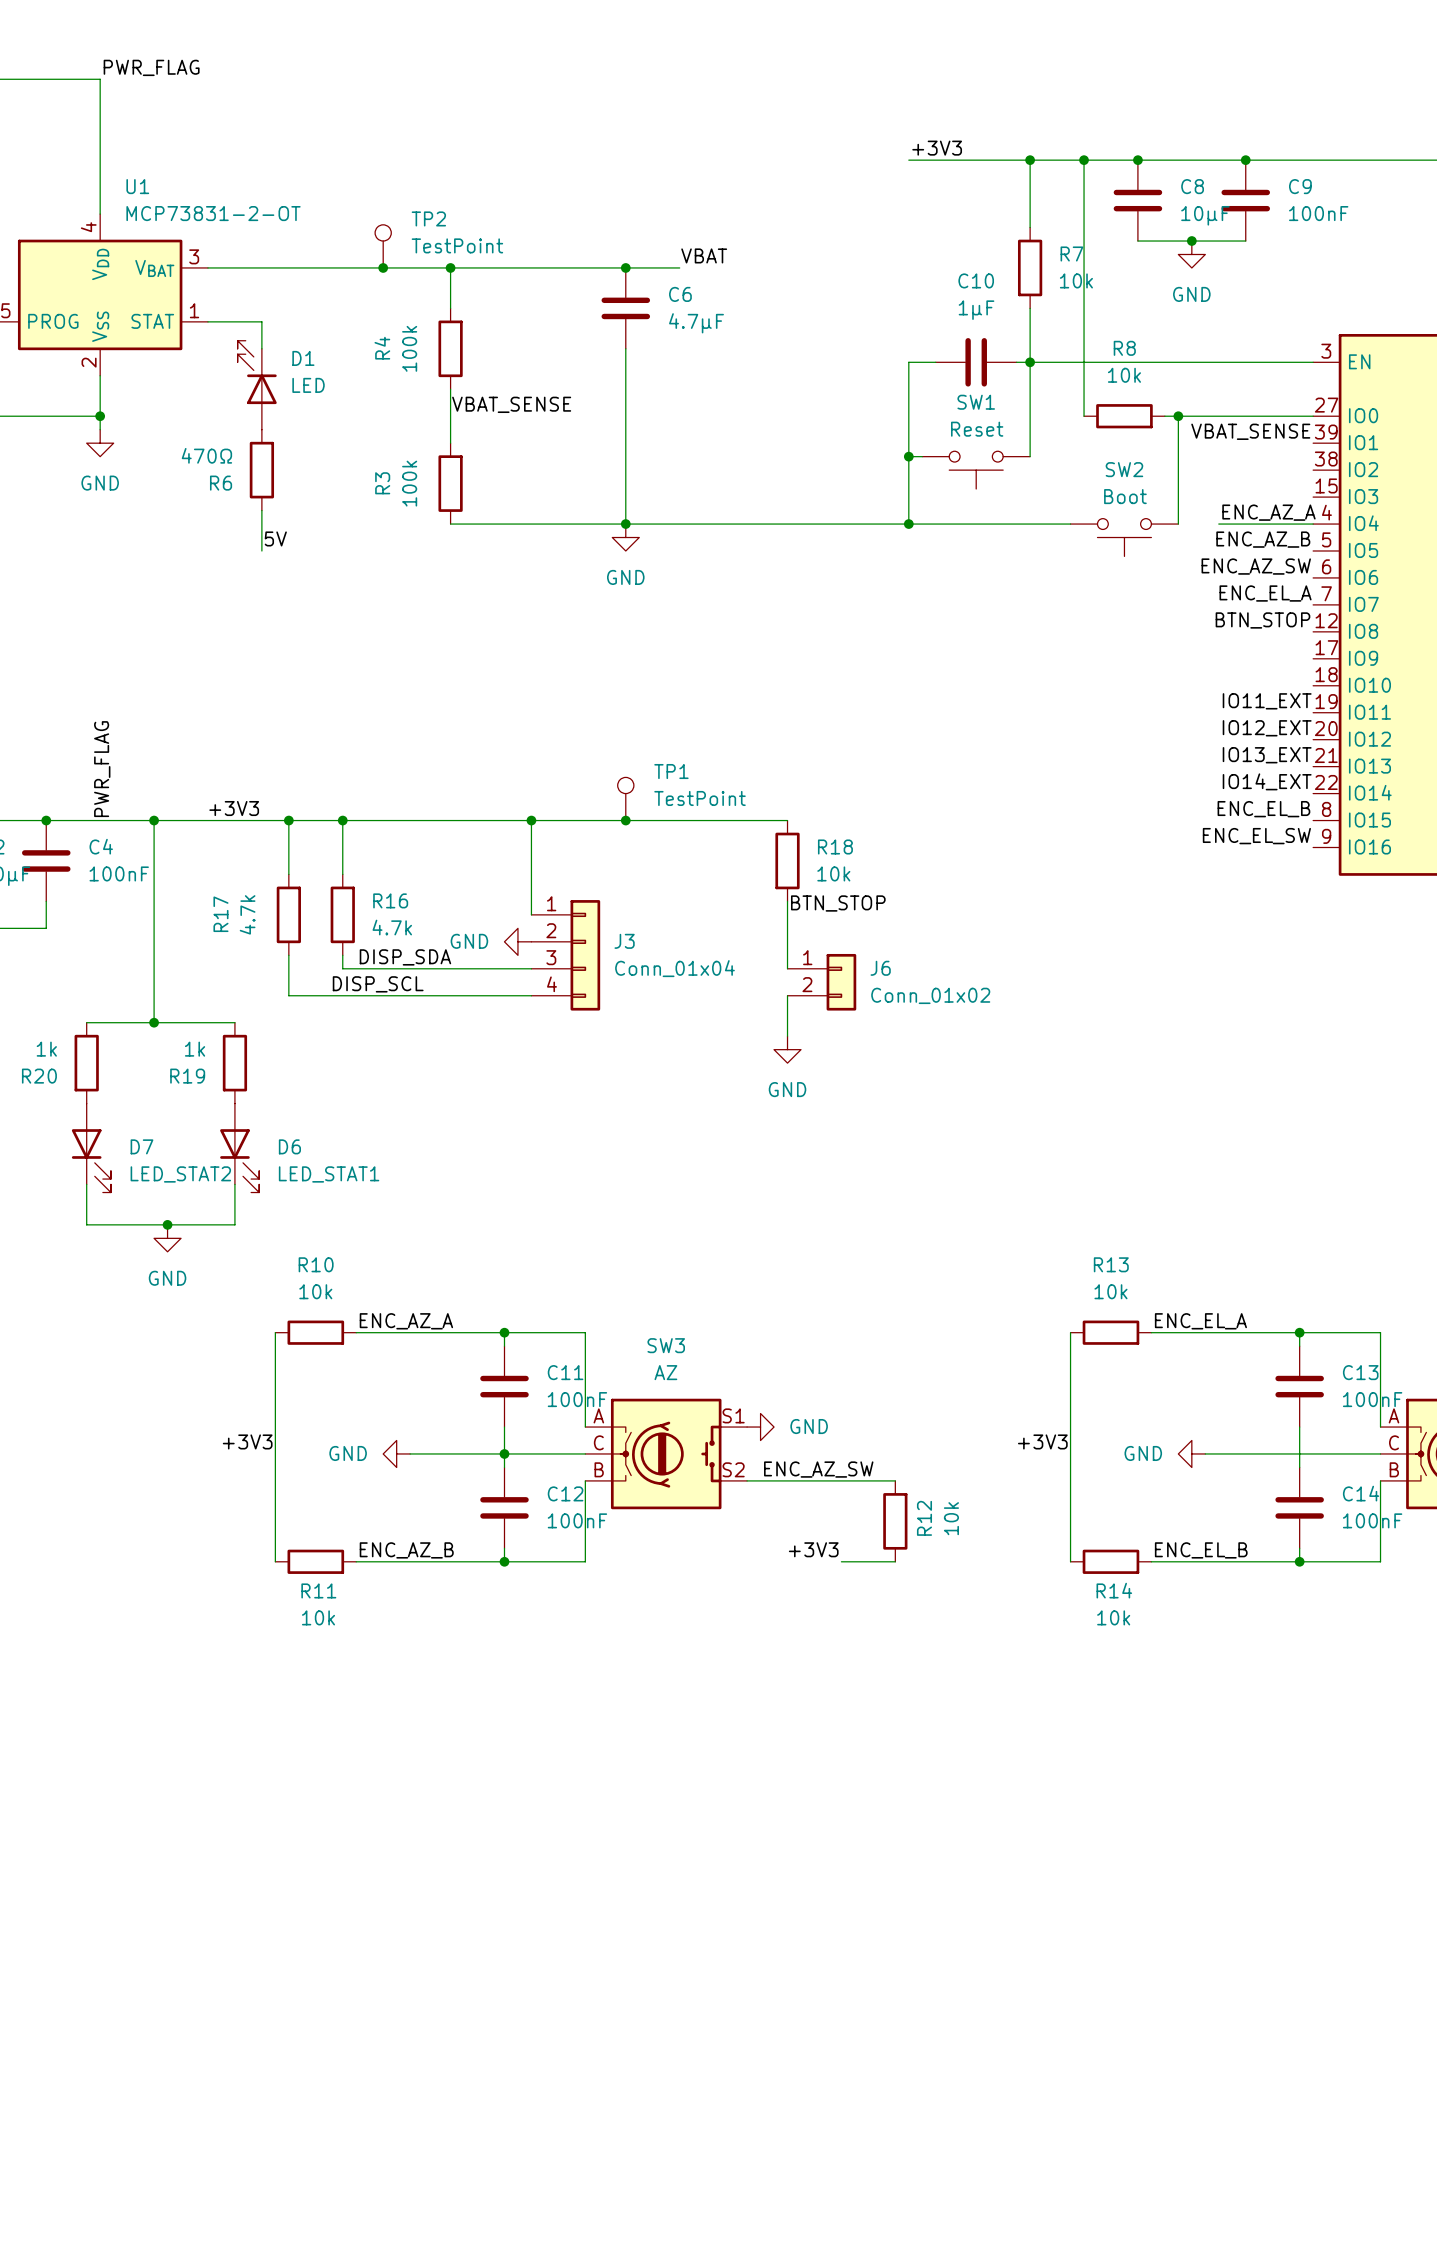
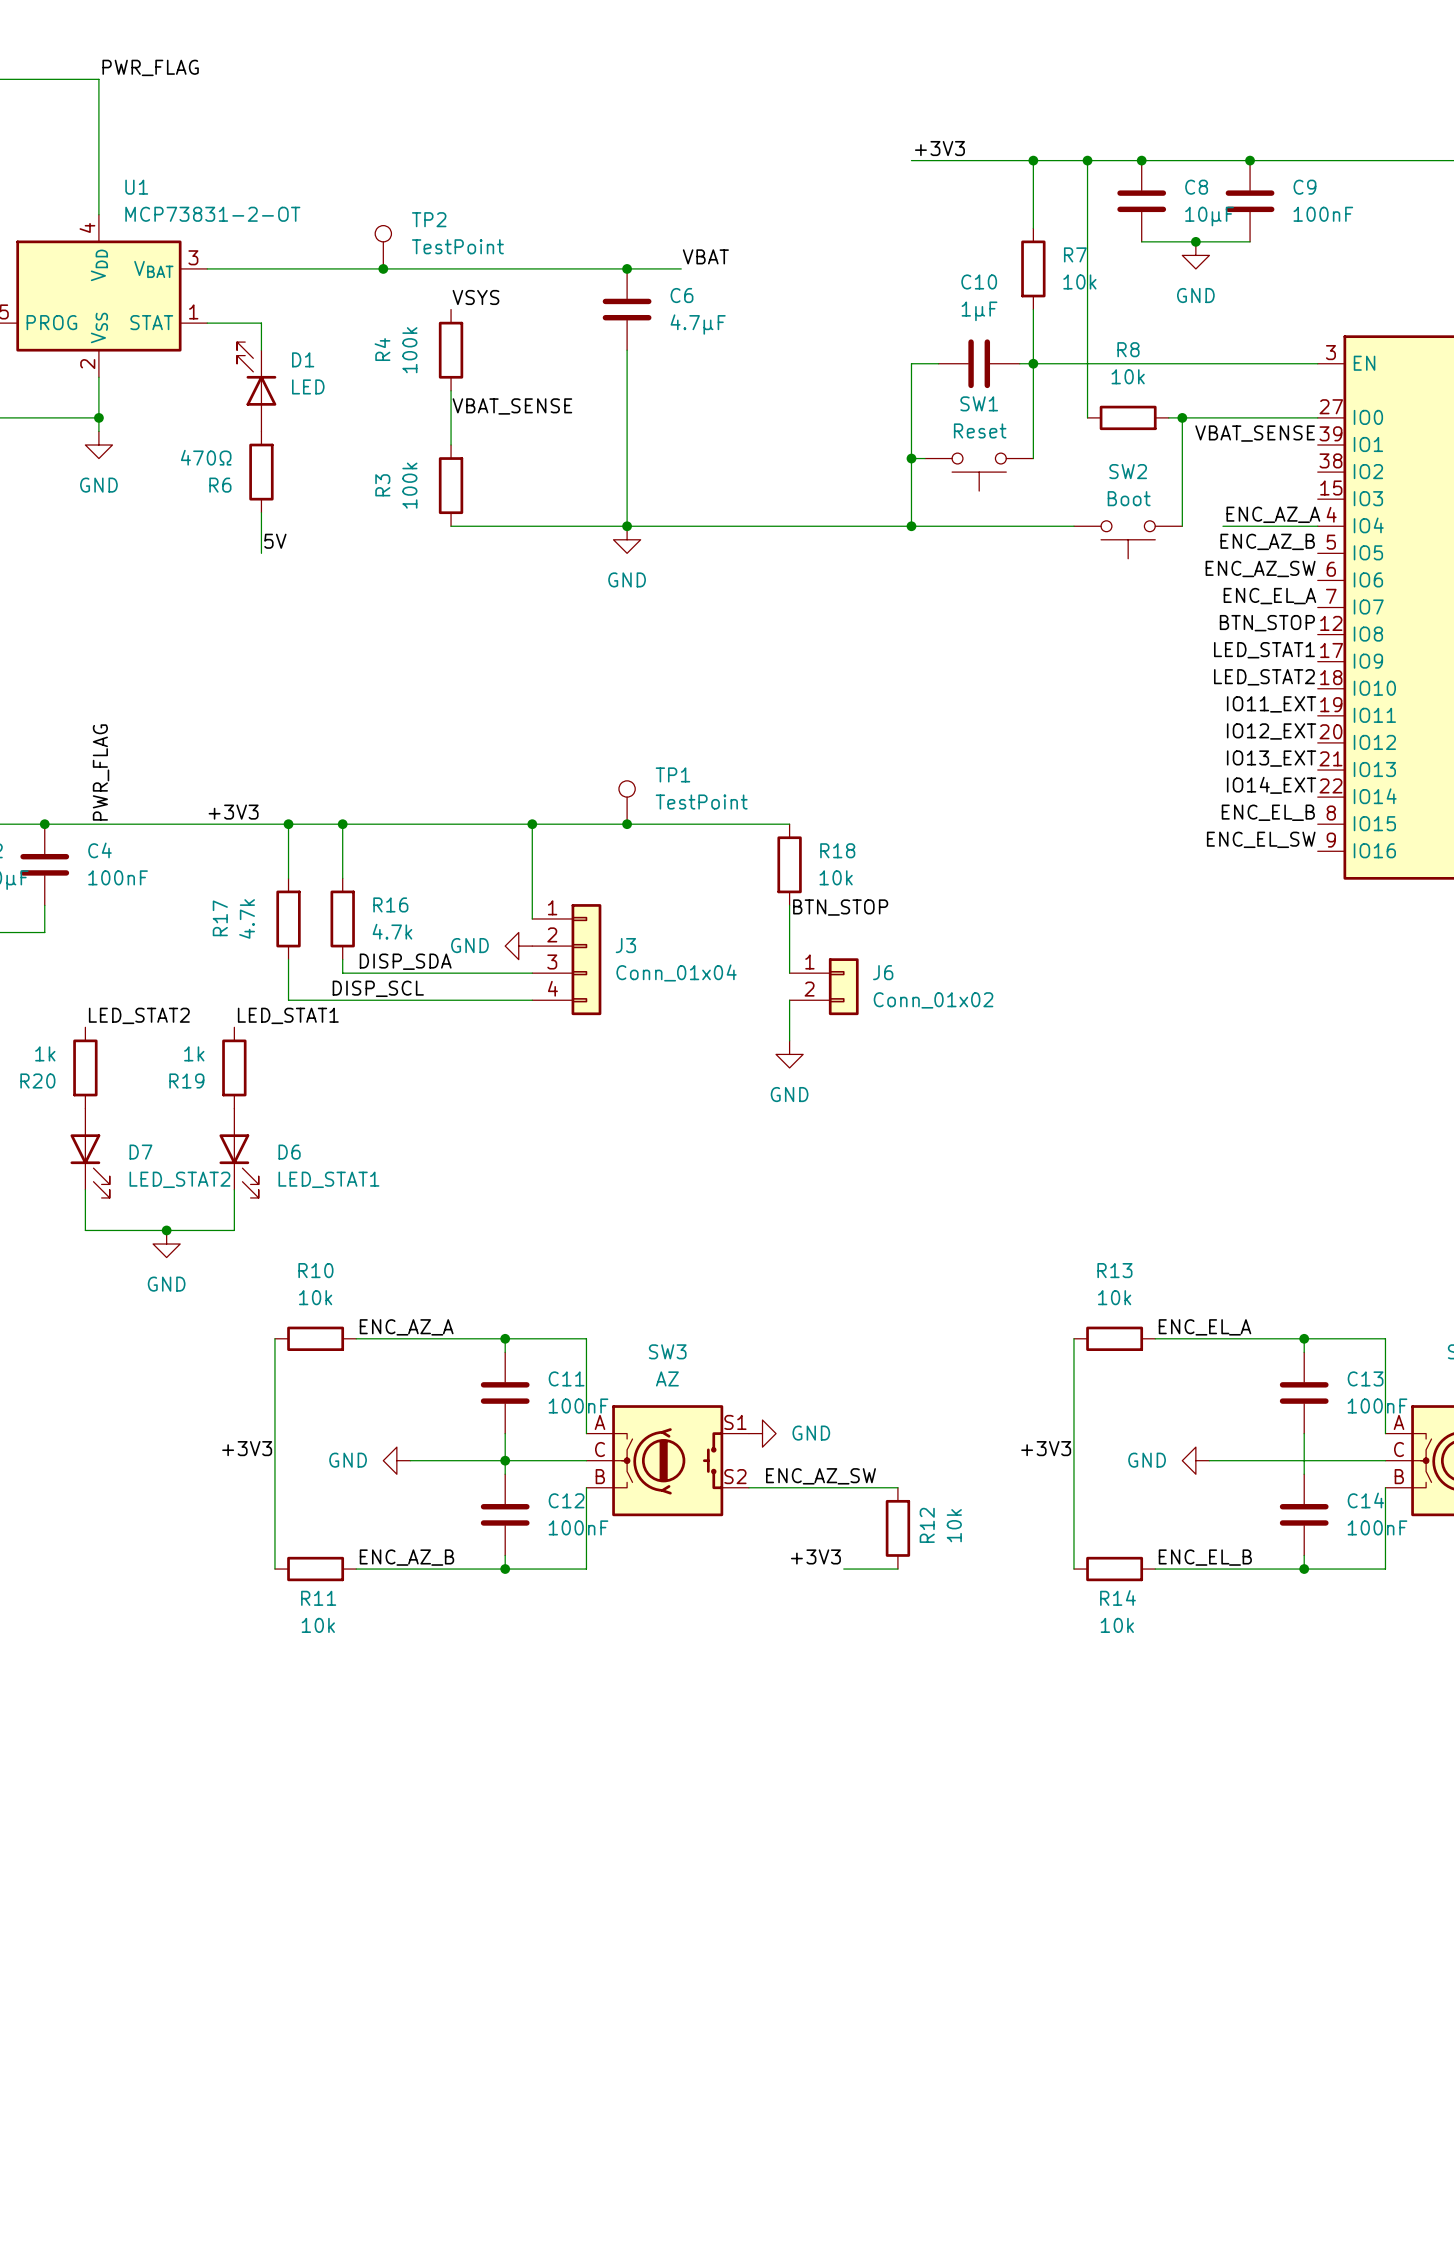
wire: (450, 267) (450, 308) -> none
junction: (450, 267) -> none
label: none -> VSYS (475, 297)
label: none -> LED_STAT1 (1264, 650)
label: none -> LED_STAT2 (1264, 677)
wire: (154, 820) (154, 1022) -> none
junction: (154, 820) -> none
label: none -> LED_STAT2 (139, 1015)
label: none -> LED_STAT1 (288, 1015)
wire: (86, 1022) (234, 1022) -> none
junction: (154, 1022) -> none

